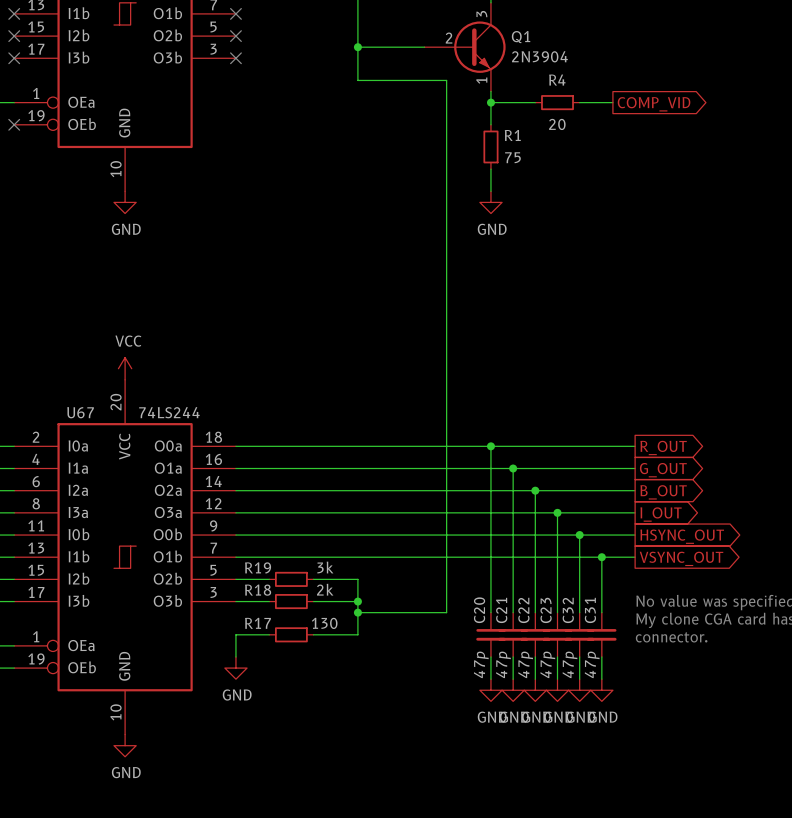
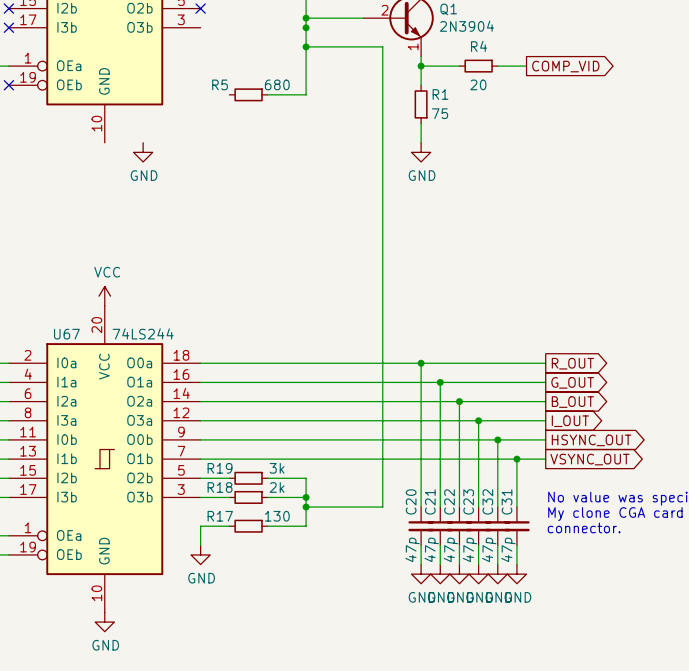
no-connect mark: (235, 58) -> none
junction: none -> (306, 27)
wire: none -> (306, 46) (306, 94) (267, 94)
junction: none -> (306, 46)
R5: none -> 680 (248, 94)
power symbol position: GND (125, 202) -> GND (143, 152)

